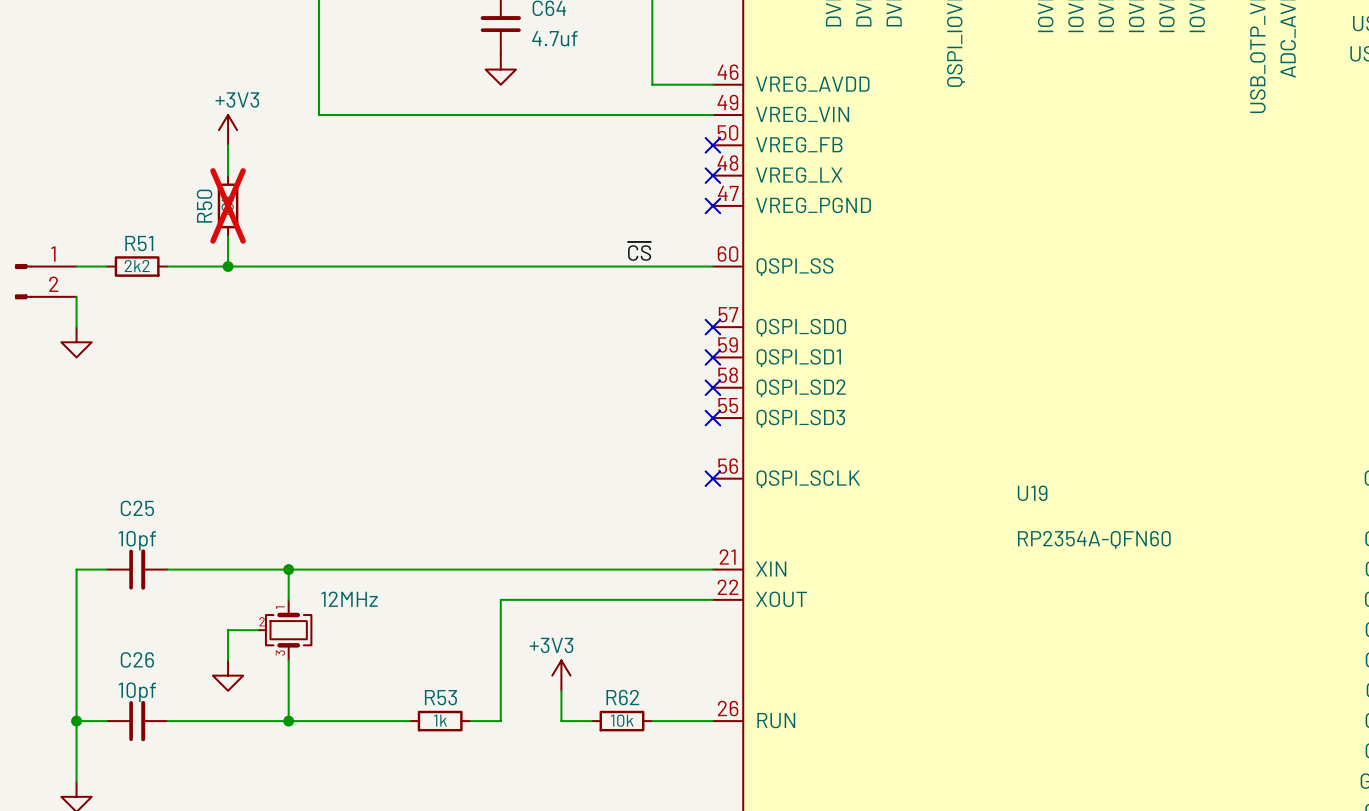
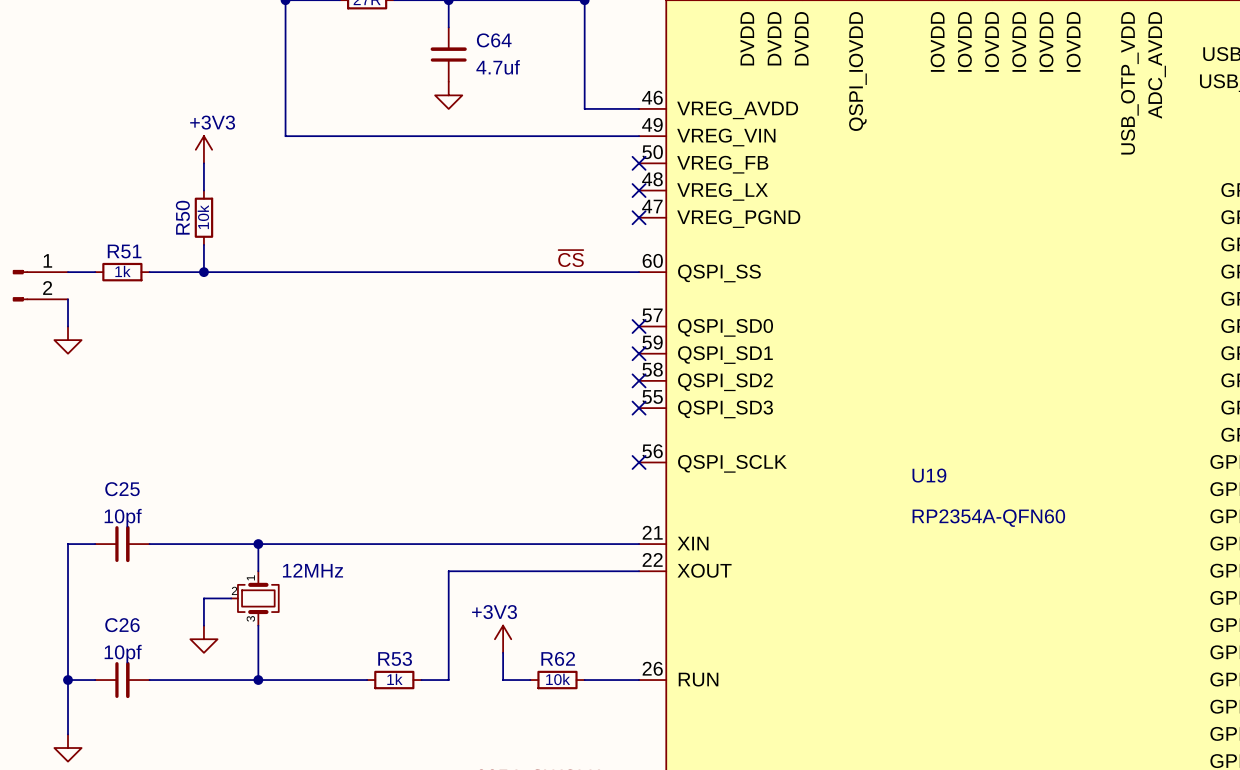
R50 do-not-place cross: (228, 205) -> none
R51 value: 2k2 (137, 266) -> 1k (122, 271)

